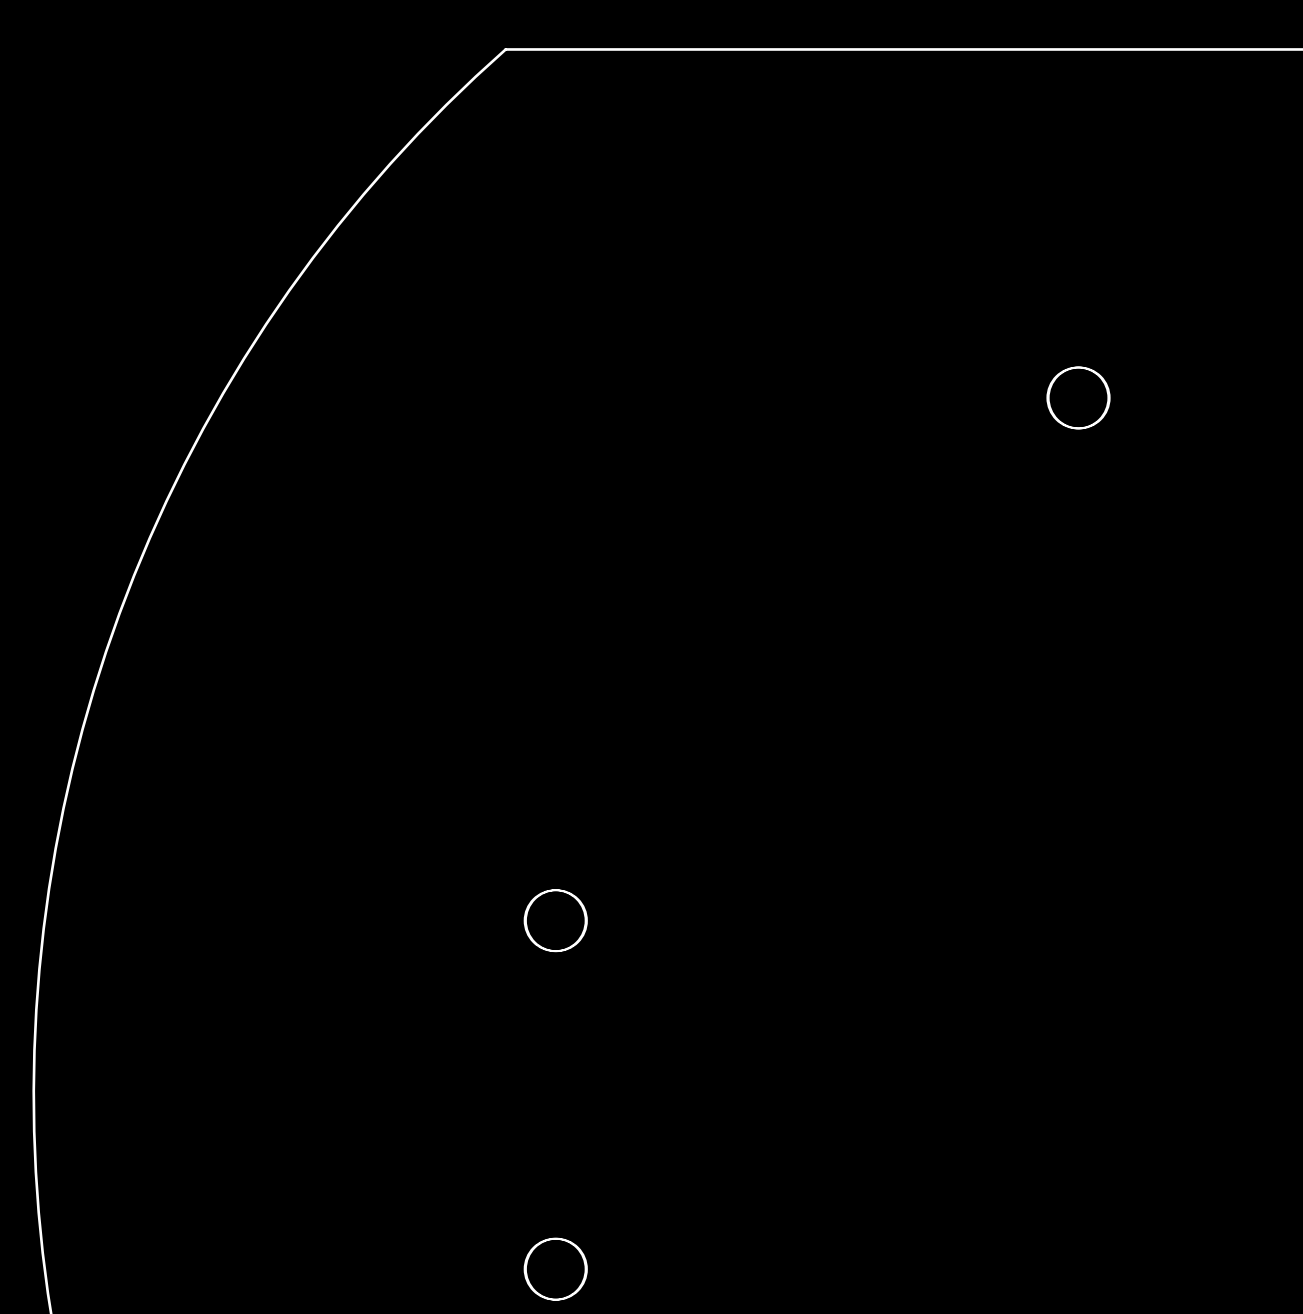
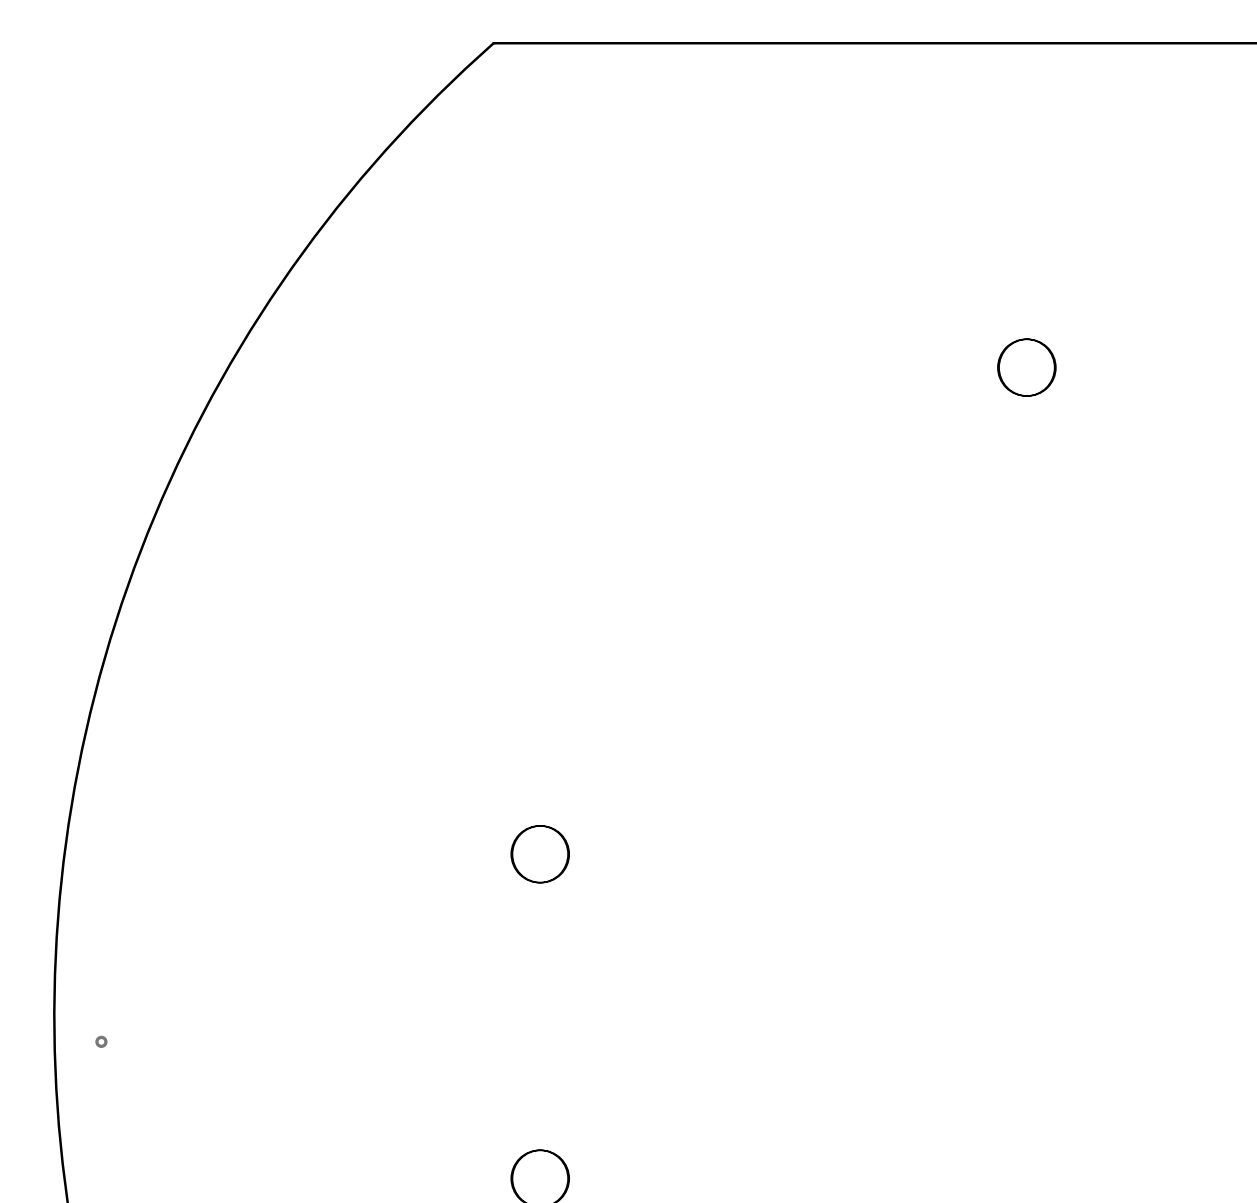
via: none -> (101, 1041)

